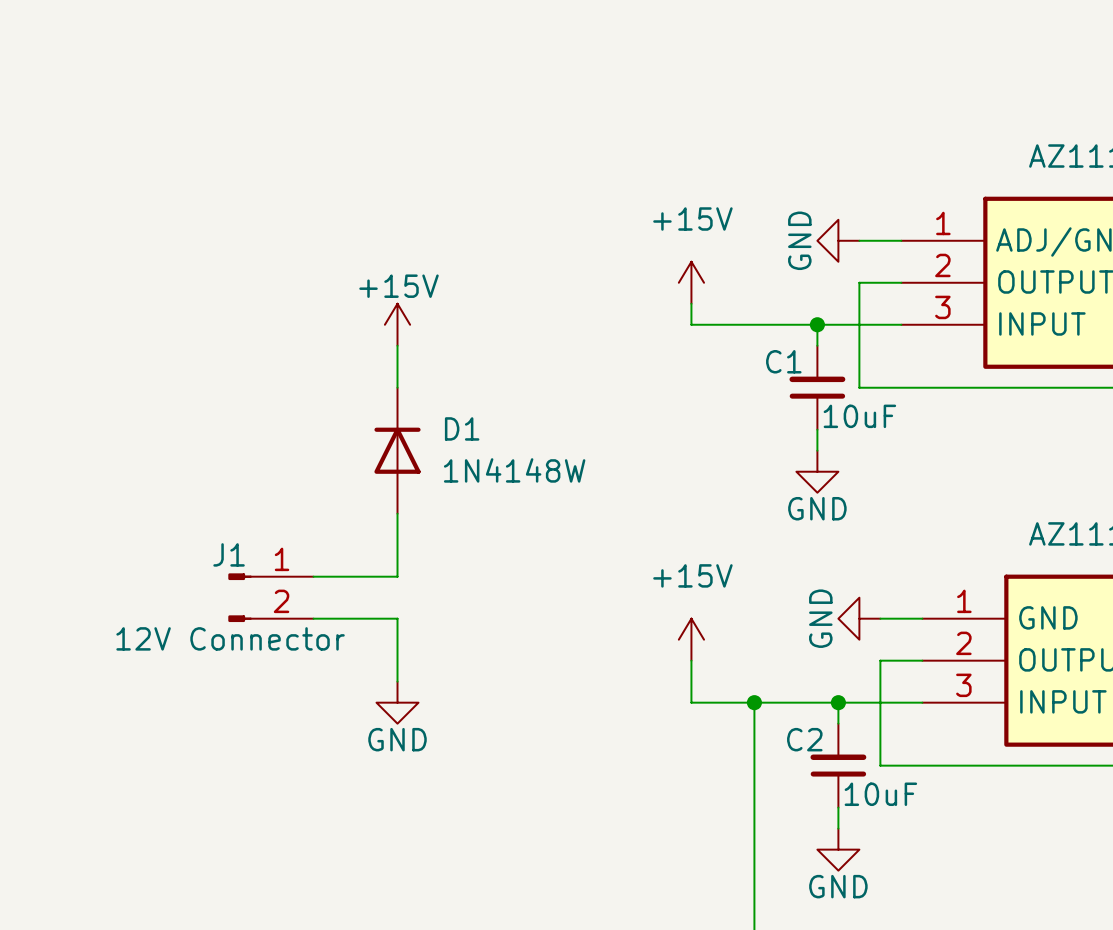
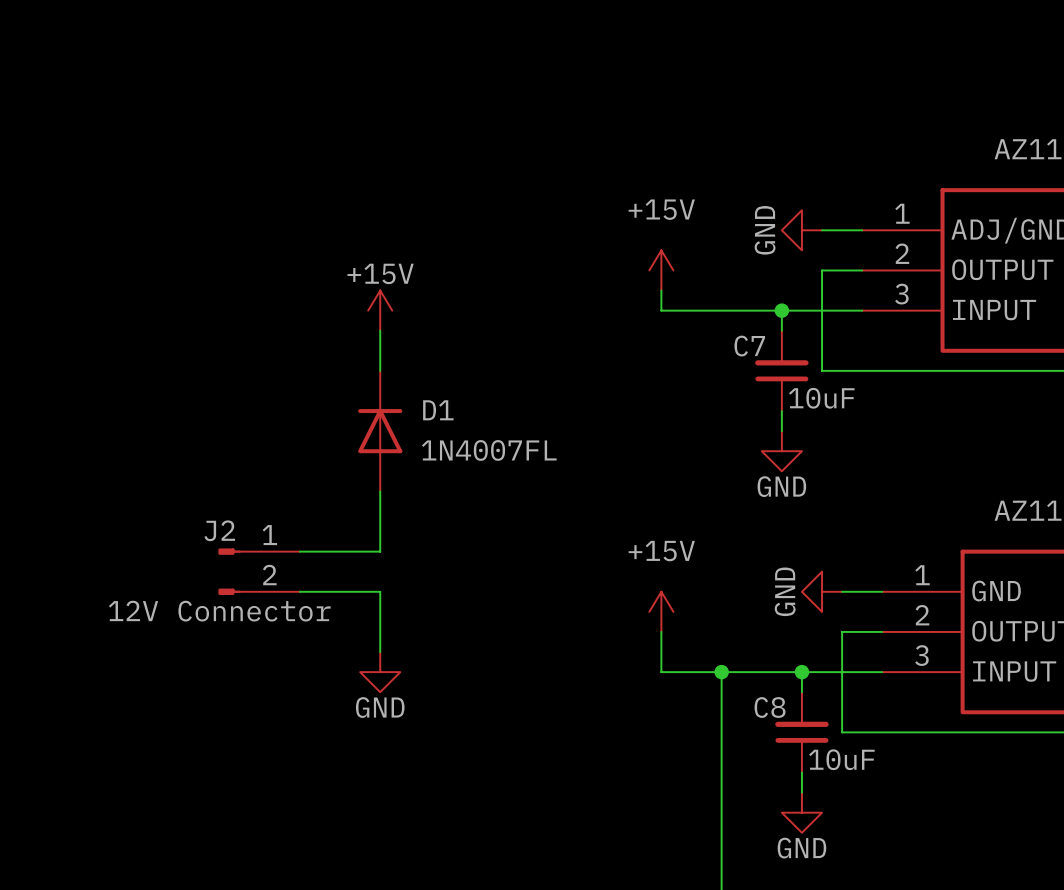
C1 name: C1 (783, 361) -> C7 (749, 346)
D1 value: 1N4148W (514, 470) -> 1N4007FL (489, 450)
J1 name: J1 (229, 554) -> J2 (219, 530)
C2 name: C2 (804, 739) -> C8 (770, 707)

